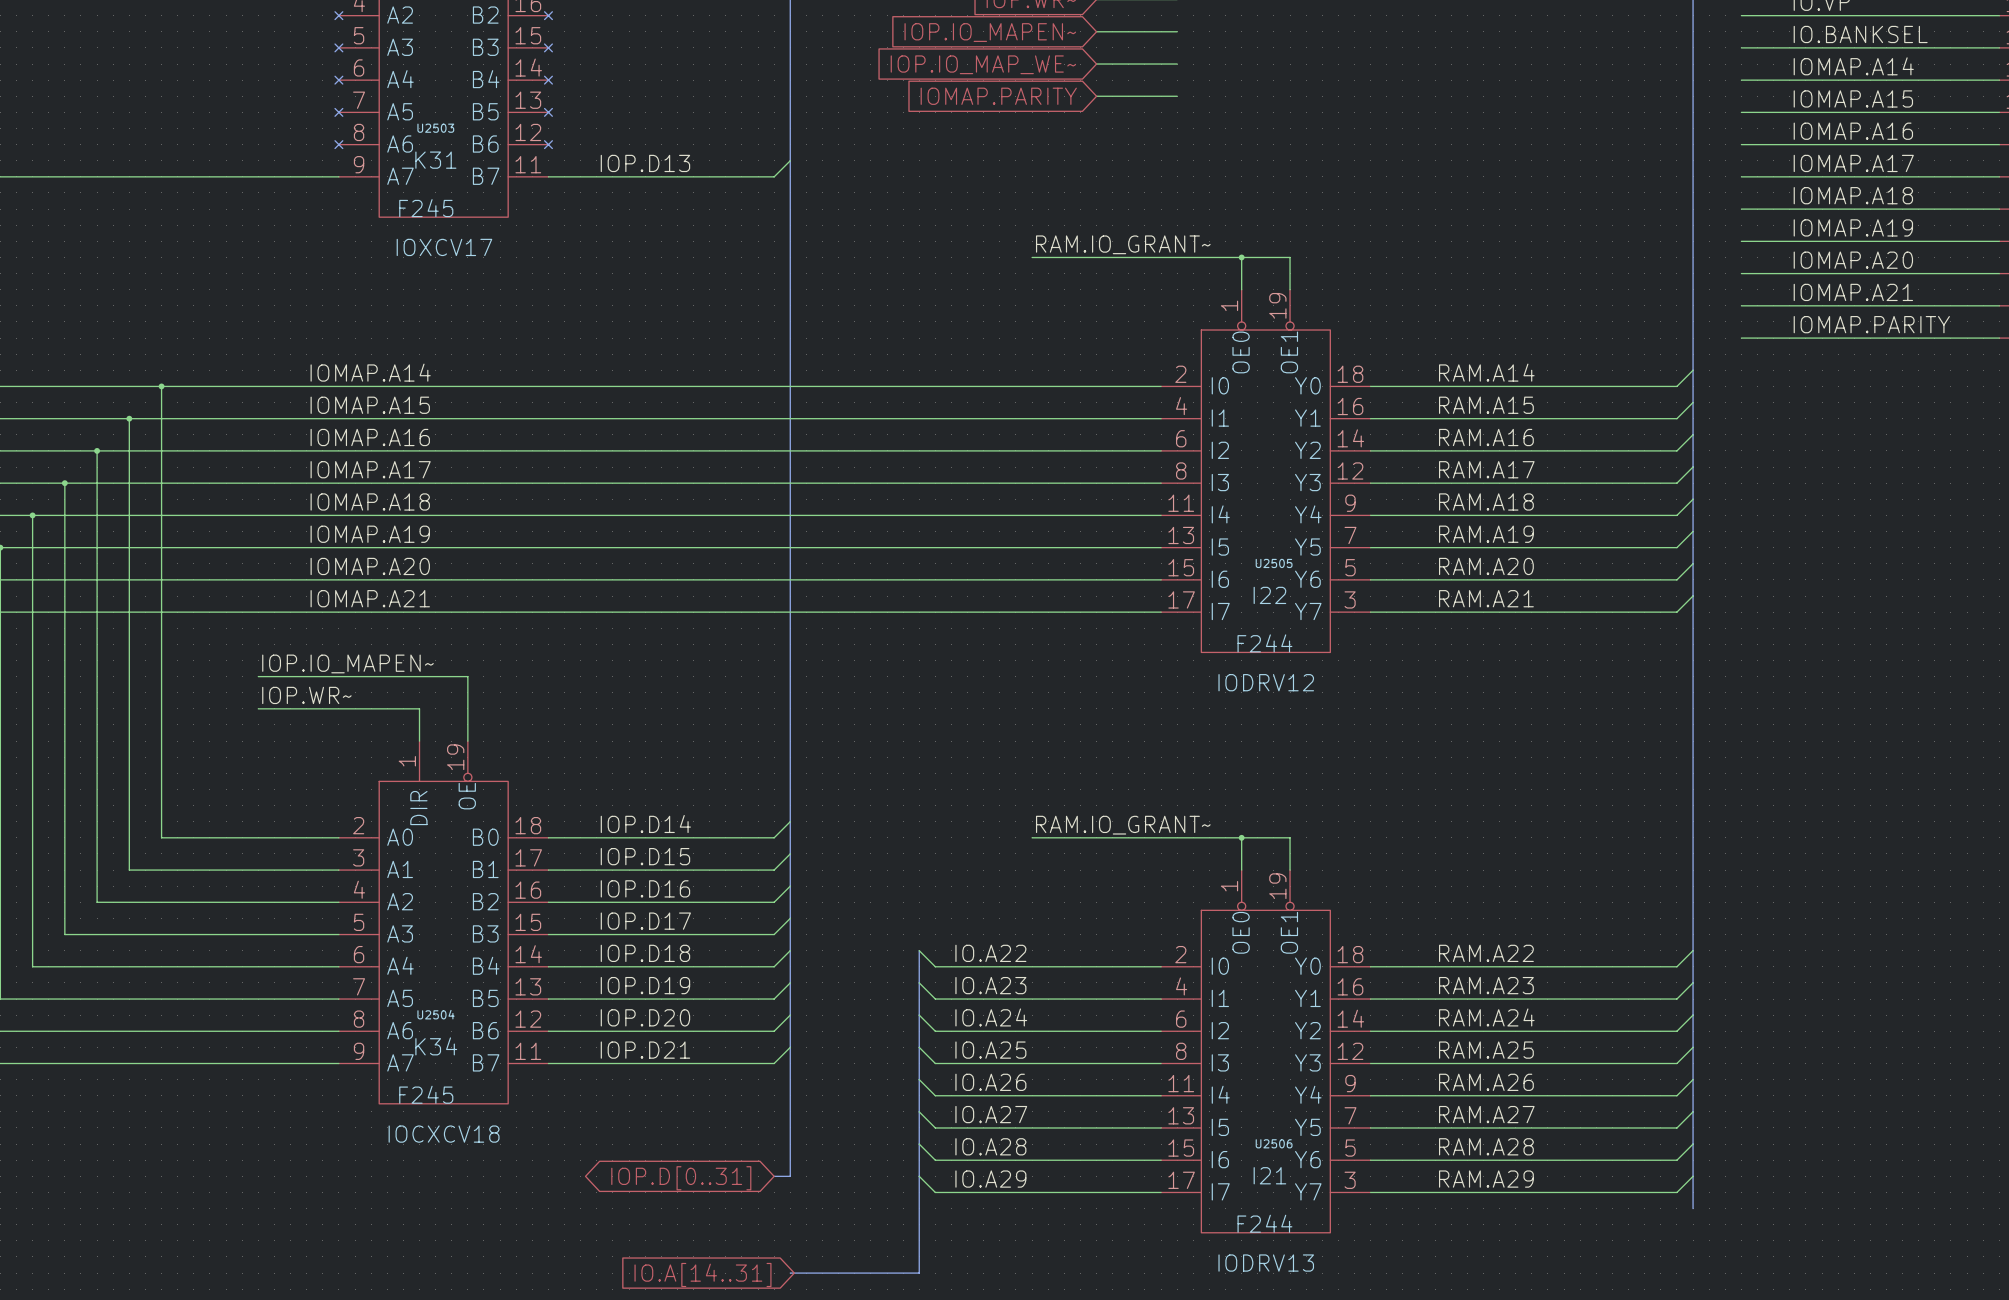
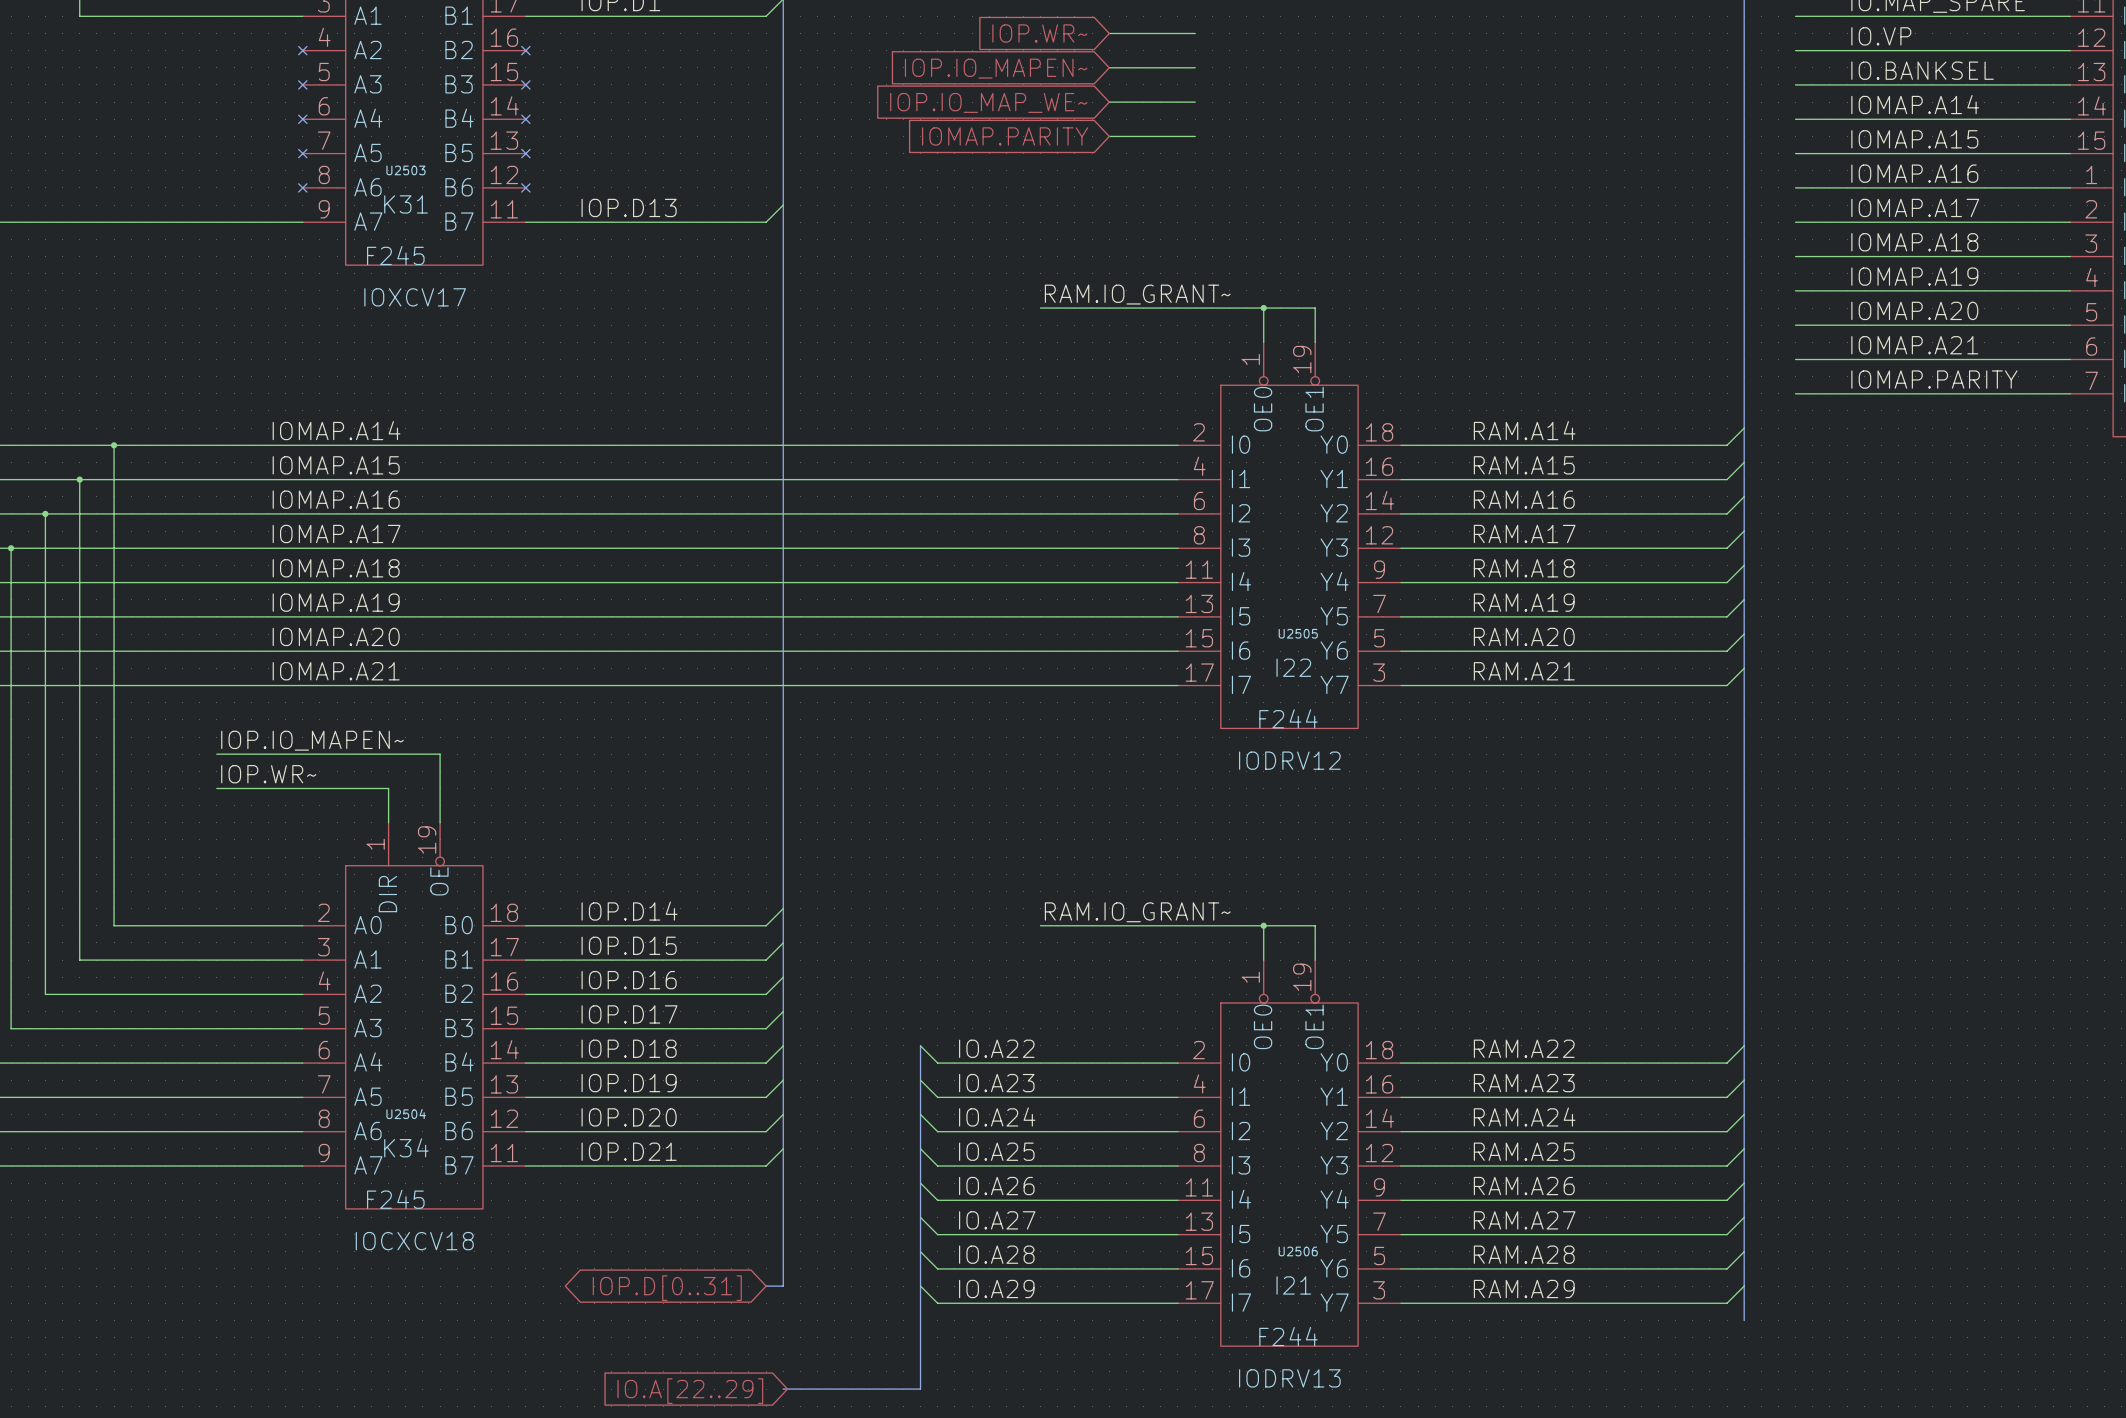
global label: IO.A[14..31] (702, 1274) -> IO.A[22..29] (690, 1391)

